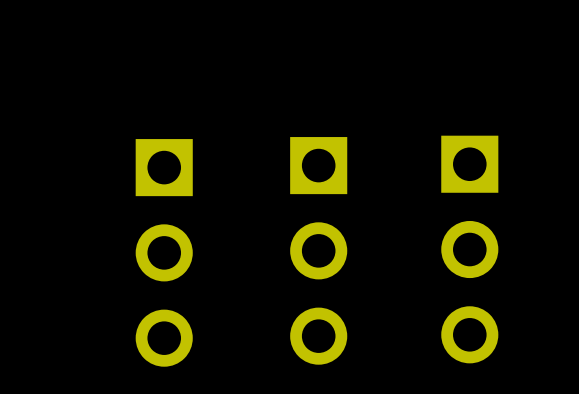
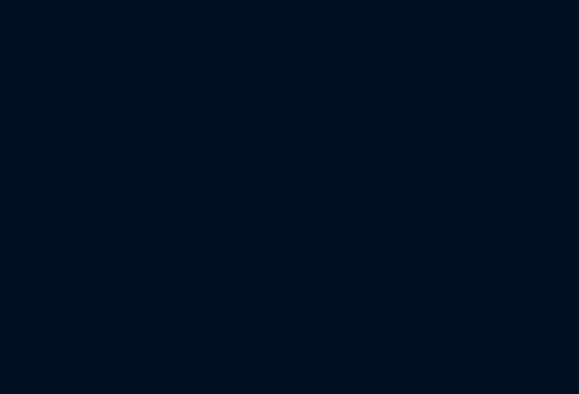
part: (469, 249) -> none
part: (318, 250) -> none
part: (164, 252) -> none

